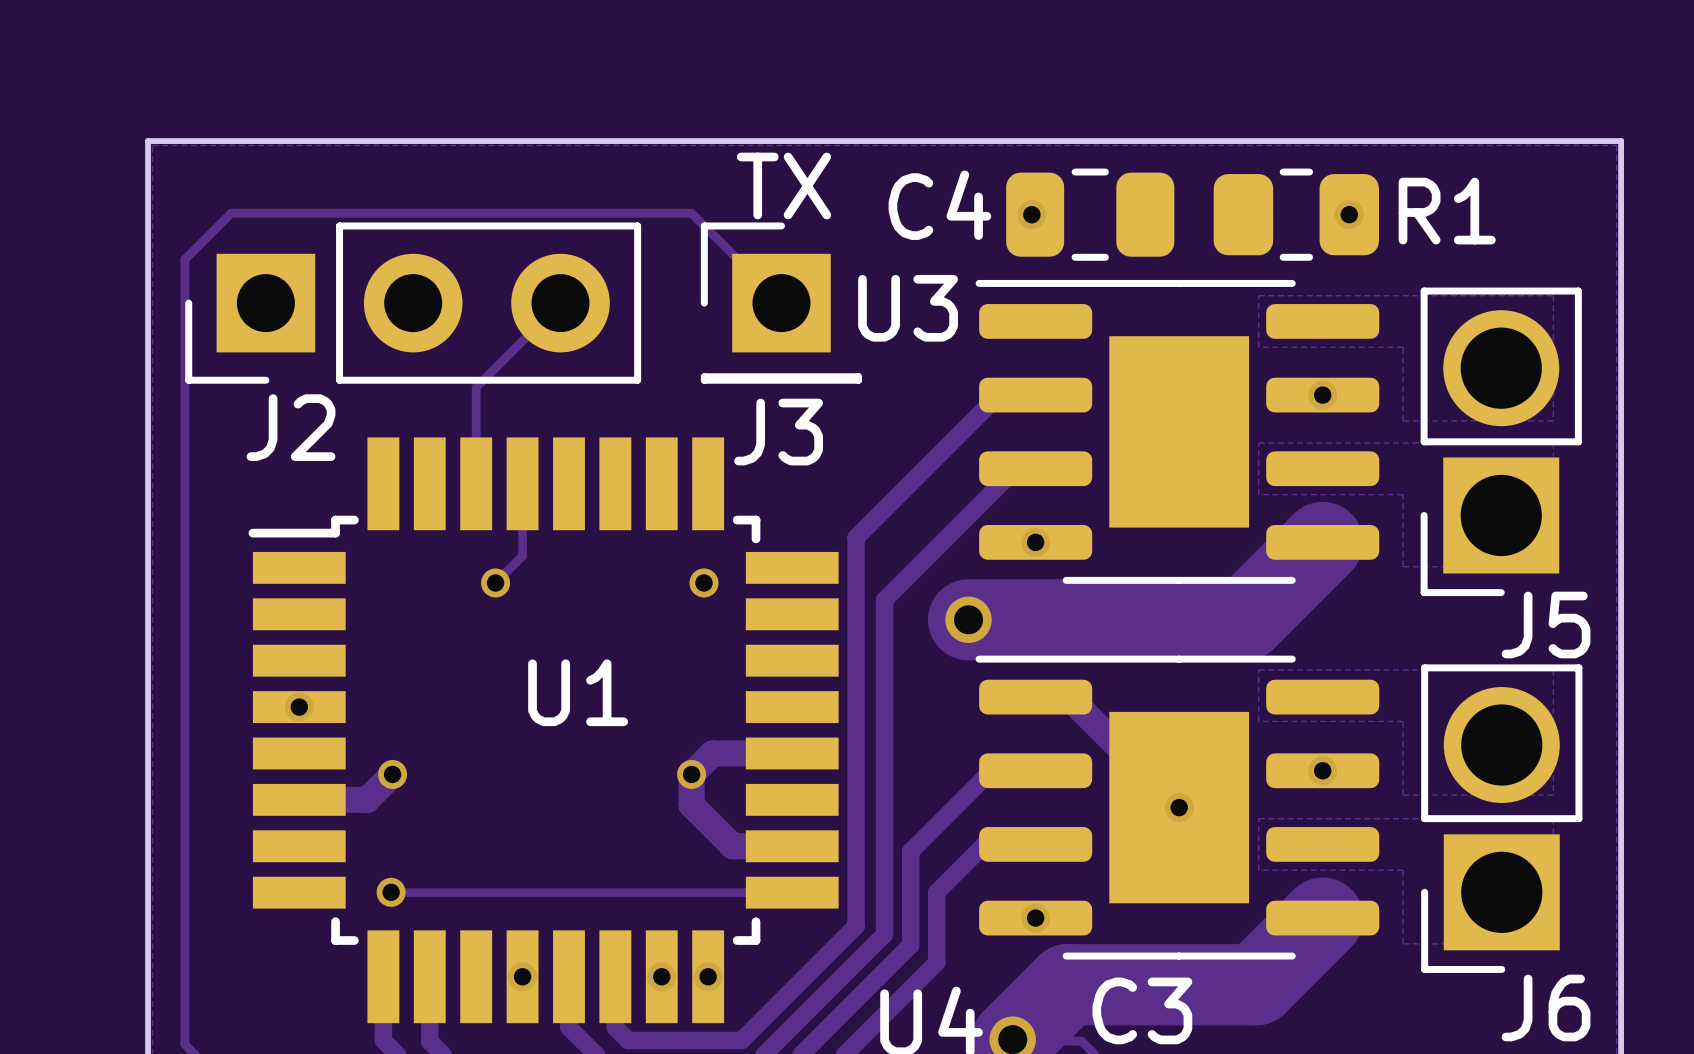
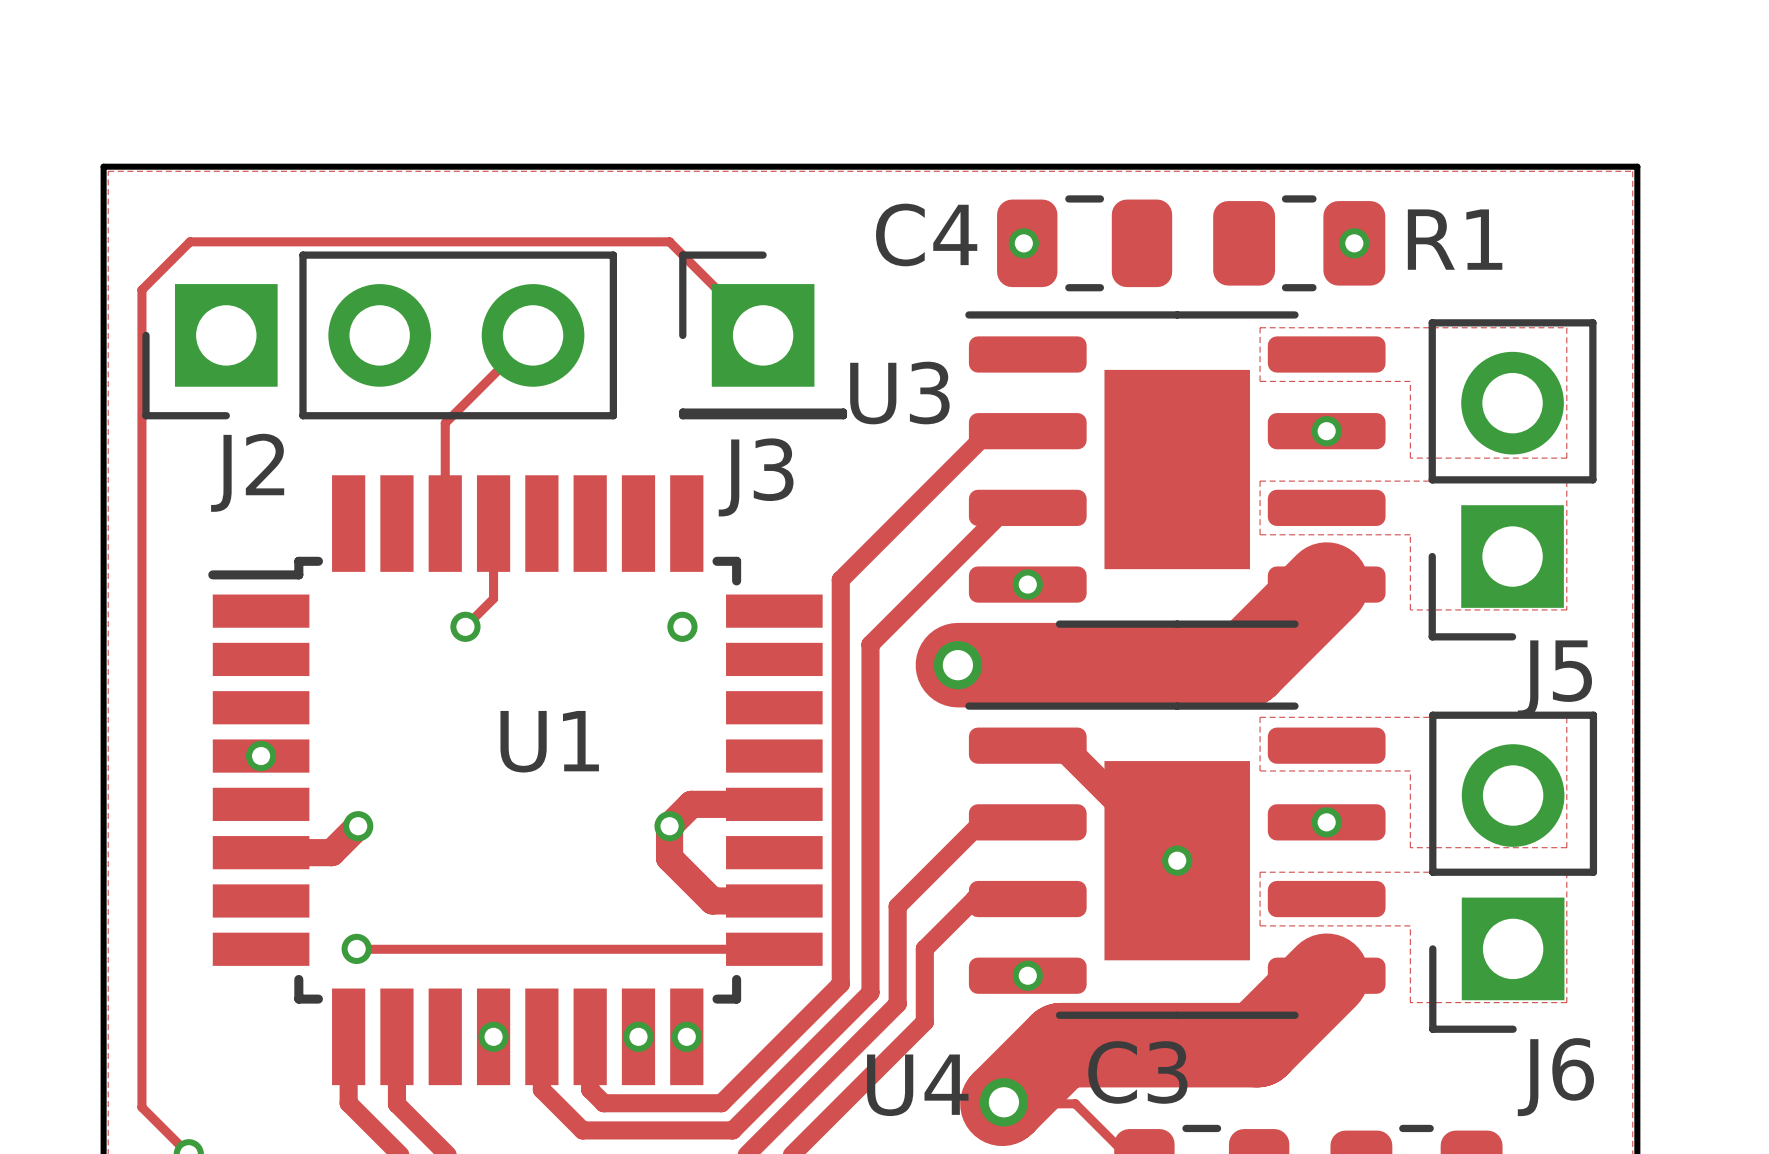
text: TX (783, 185) -> none
J5 footprint: [1420, 287, 1582, 597] -> [1428, 319, 1597, 641]
U3 name position: U3 (908, 308) -> U3 (899, 393)
J6 footprint: [1421, 664, 1583, 973] -> [1429, 711, 1598, 1033]

